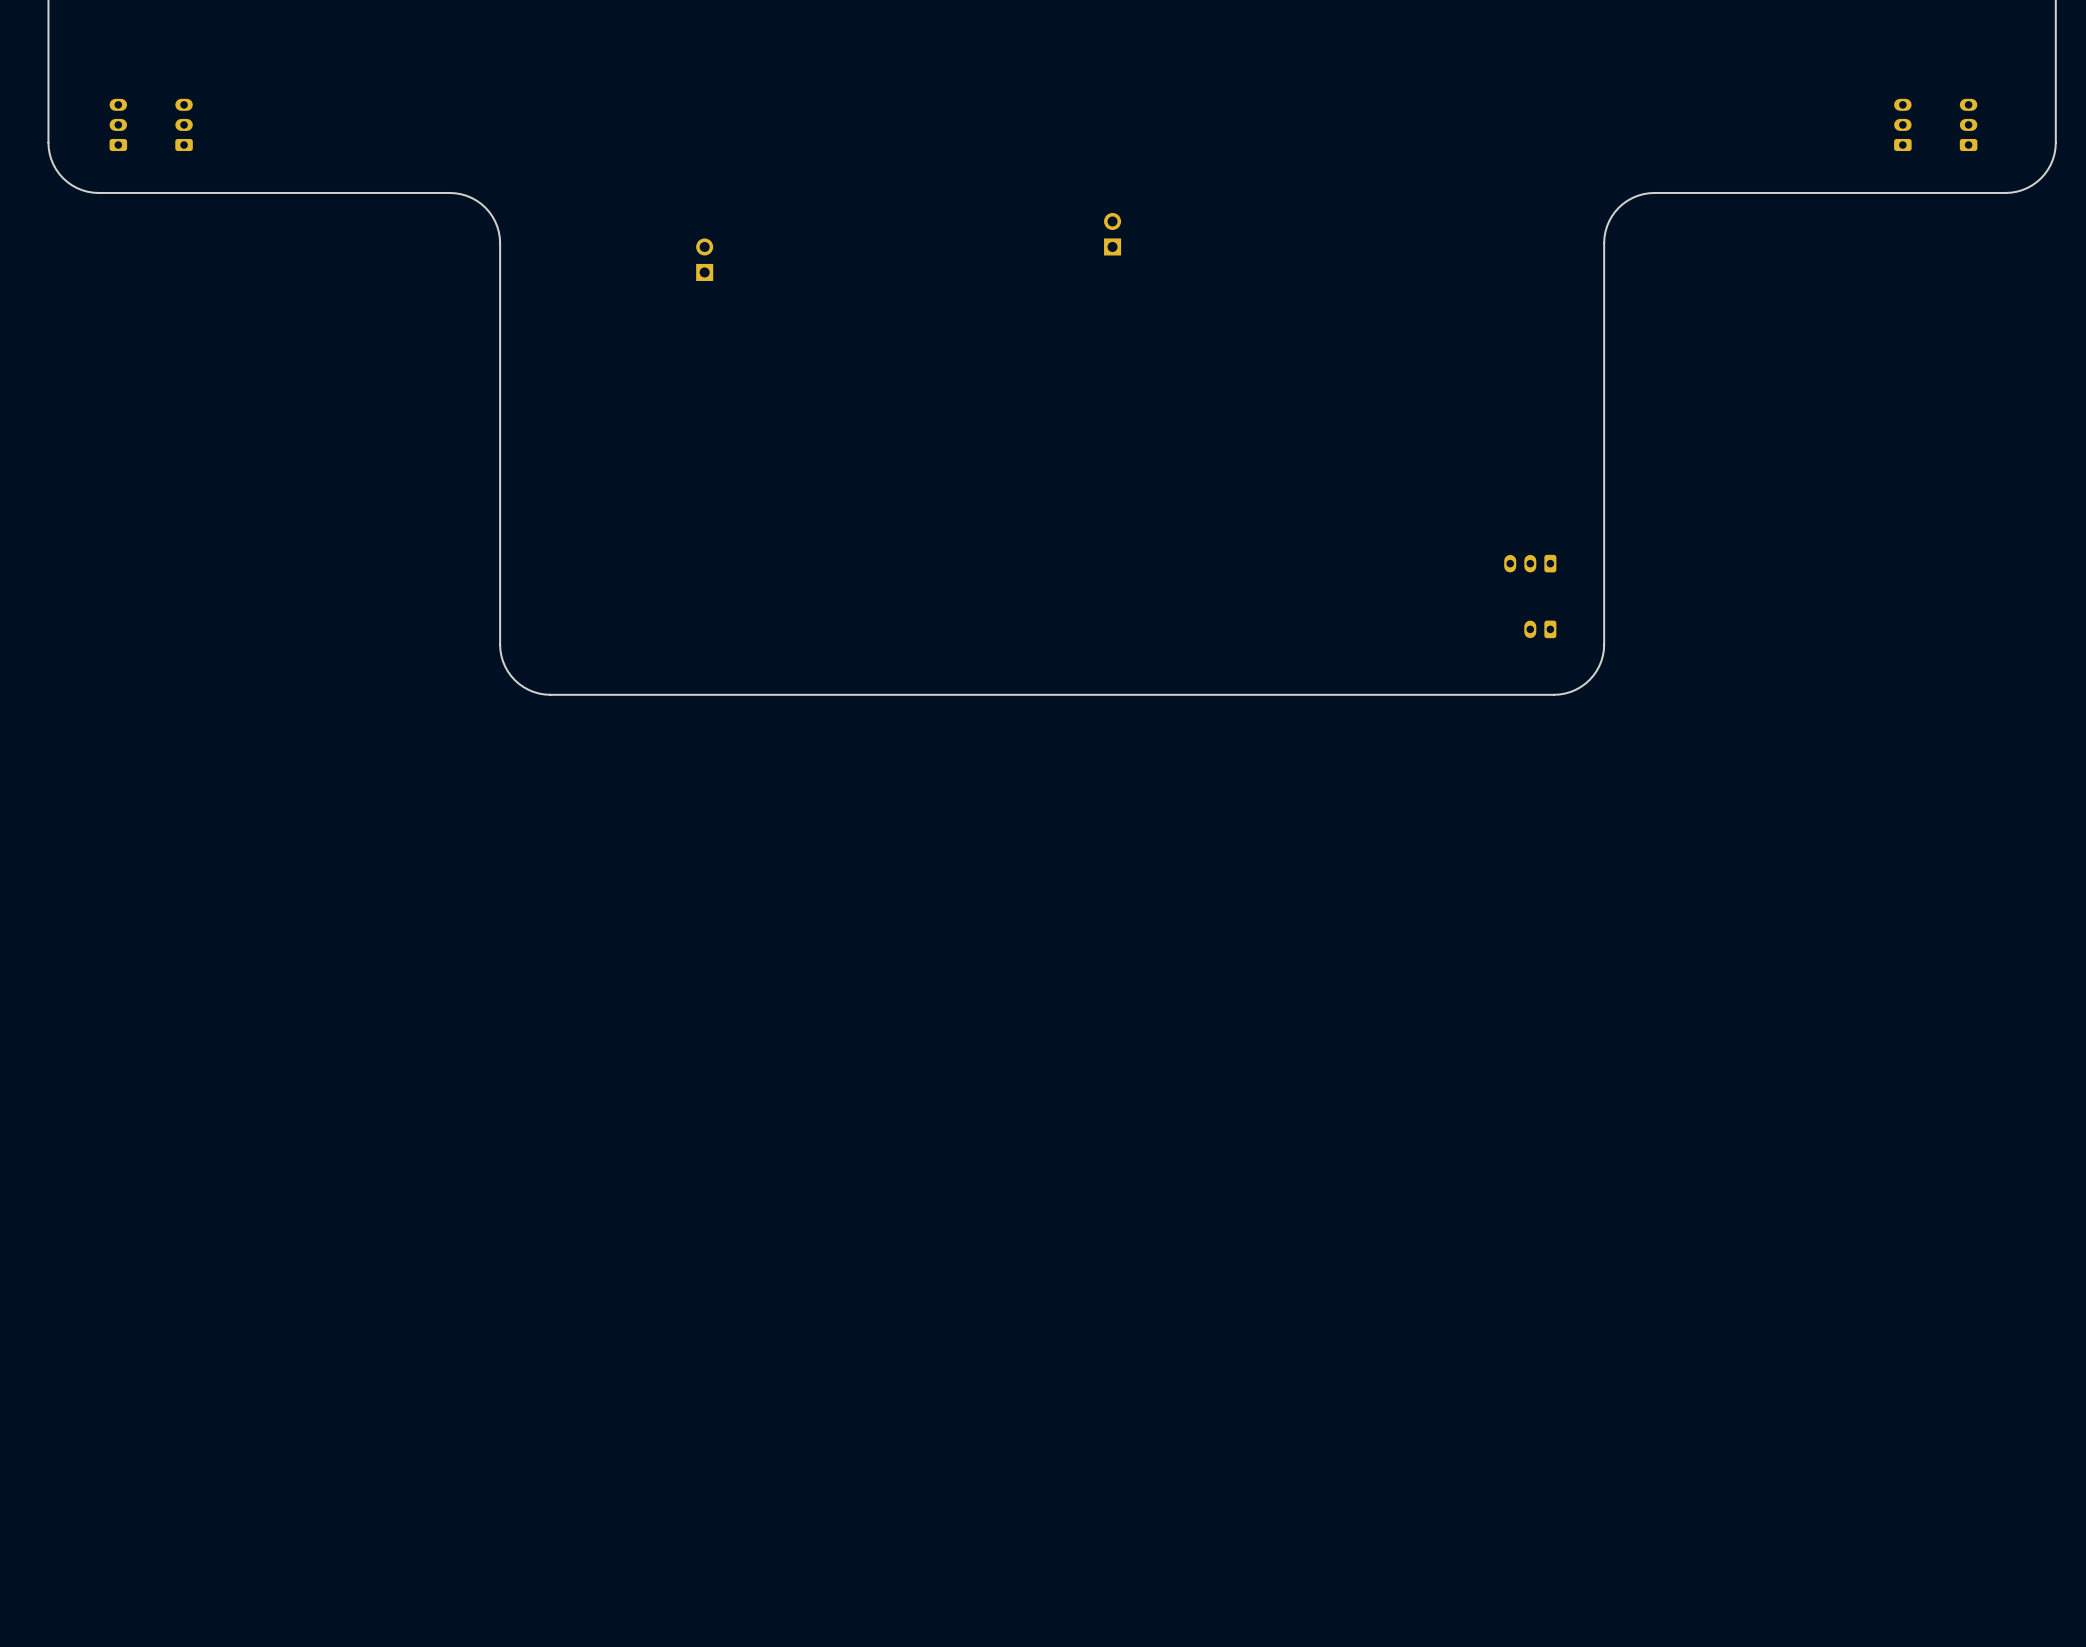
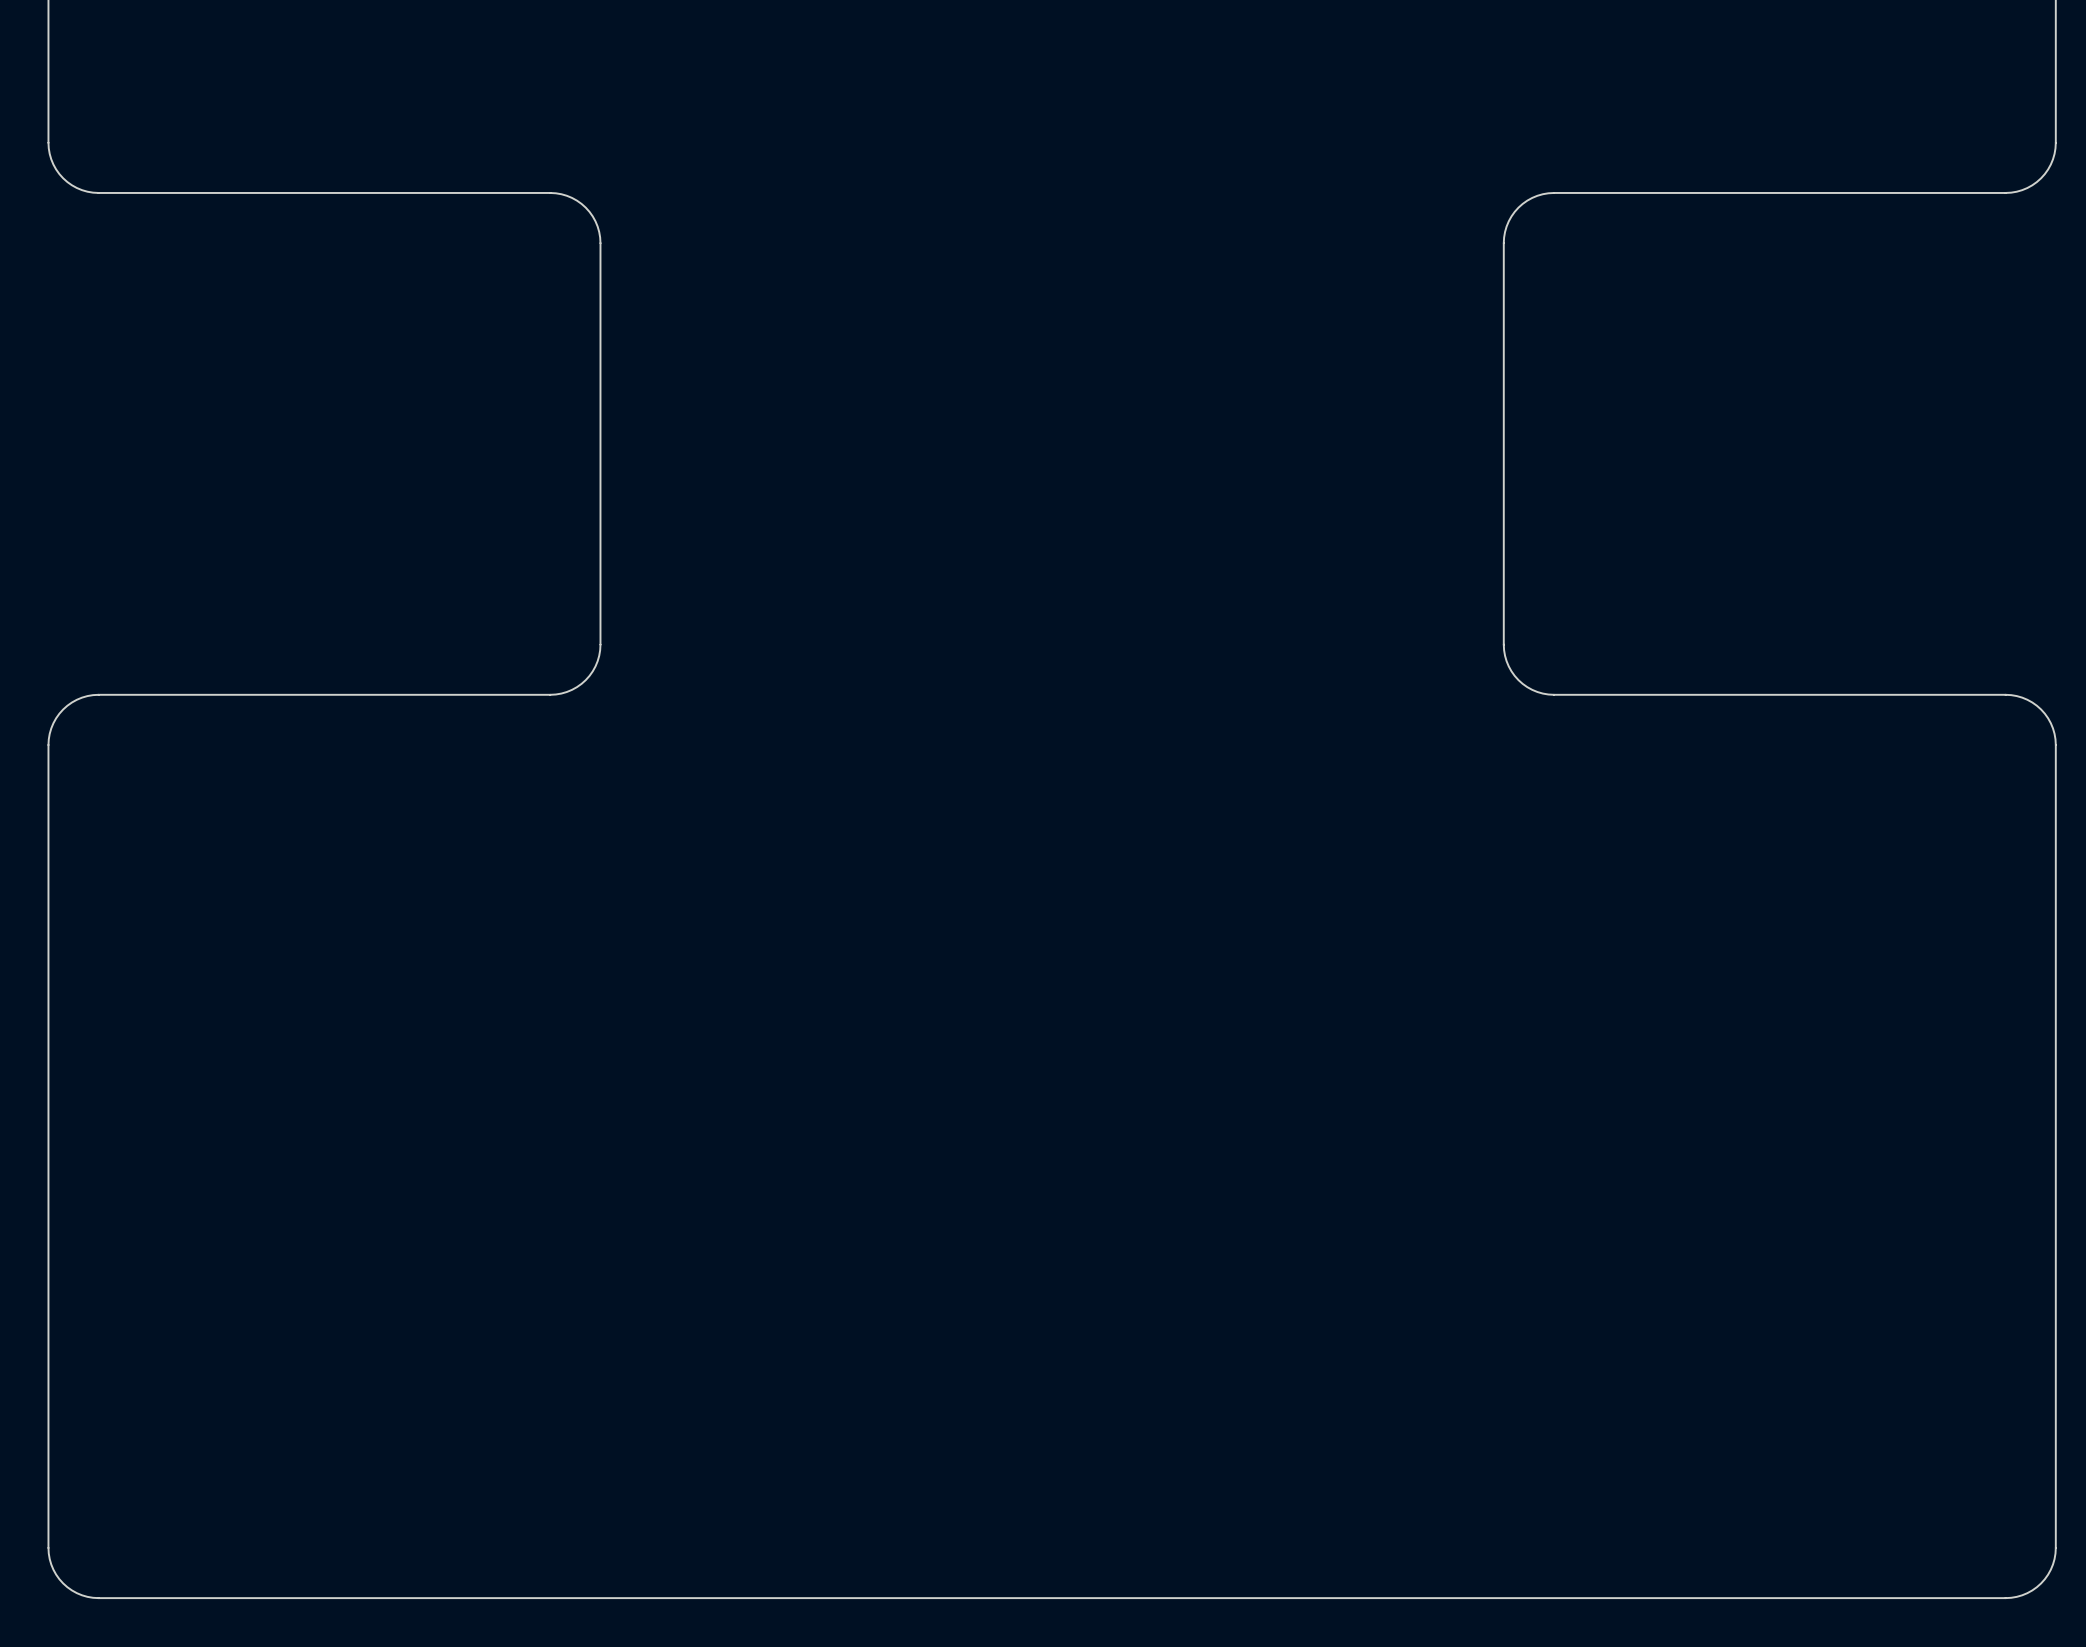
part: (118, 124) -> none
part: (184, 124) -> none
part: (1902, 124) -> none
part: (1968, 124) -> none
board edge: (1654, 192) (1637, 195) (1623, 203) (1611, 216) (1605, 231) (1603, 650) (1596, 671) (1585, 683) (1570, 691) (1553, 694) (550, 694) (528, 689) (514, 680) (507, 671) (500, 650) (499, 237) (495, 221) (481, 203) (466, 195) (449, 192) -> (1654, 192) (1542, 194) (1527, 200) (1518, 207) (1506, 226) (1503, 243) (1505, 655) (1511, 671) (1522, 683) (1537, 691) (1548, 694) (2005, 694) (2022, 697) (2032, 702) (2048, 718) (2054, 733) (2055, 744) (2055, 1547) (2053, 1564) (2041, 1583) (2022, 1595) (2005, 1598) (87, 1596) (71, 1590) (59, 1579) (51, 1564) (48, 1547) (48, 744) (53, 723) (59, 713) (71, 702) (93, 695) (555, 694) (566, 691) (581, 683) (592, 671) (599, 655) (600, 243) (597, 226) (585, 207) (572, 197) (561, 194) (449, 192)
part: (1112, 234) -> none
part: (704, 259) -> none
part: (1530, 563) -> none
part: (1540, 629) -> none

